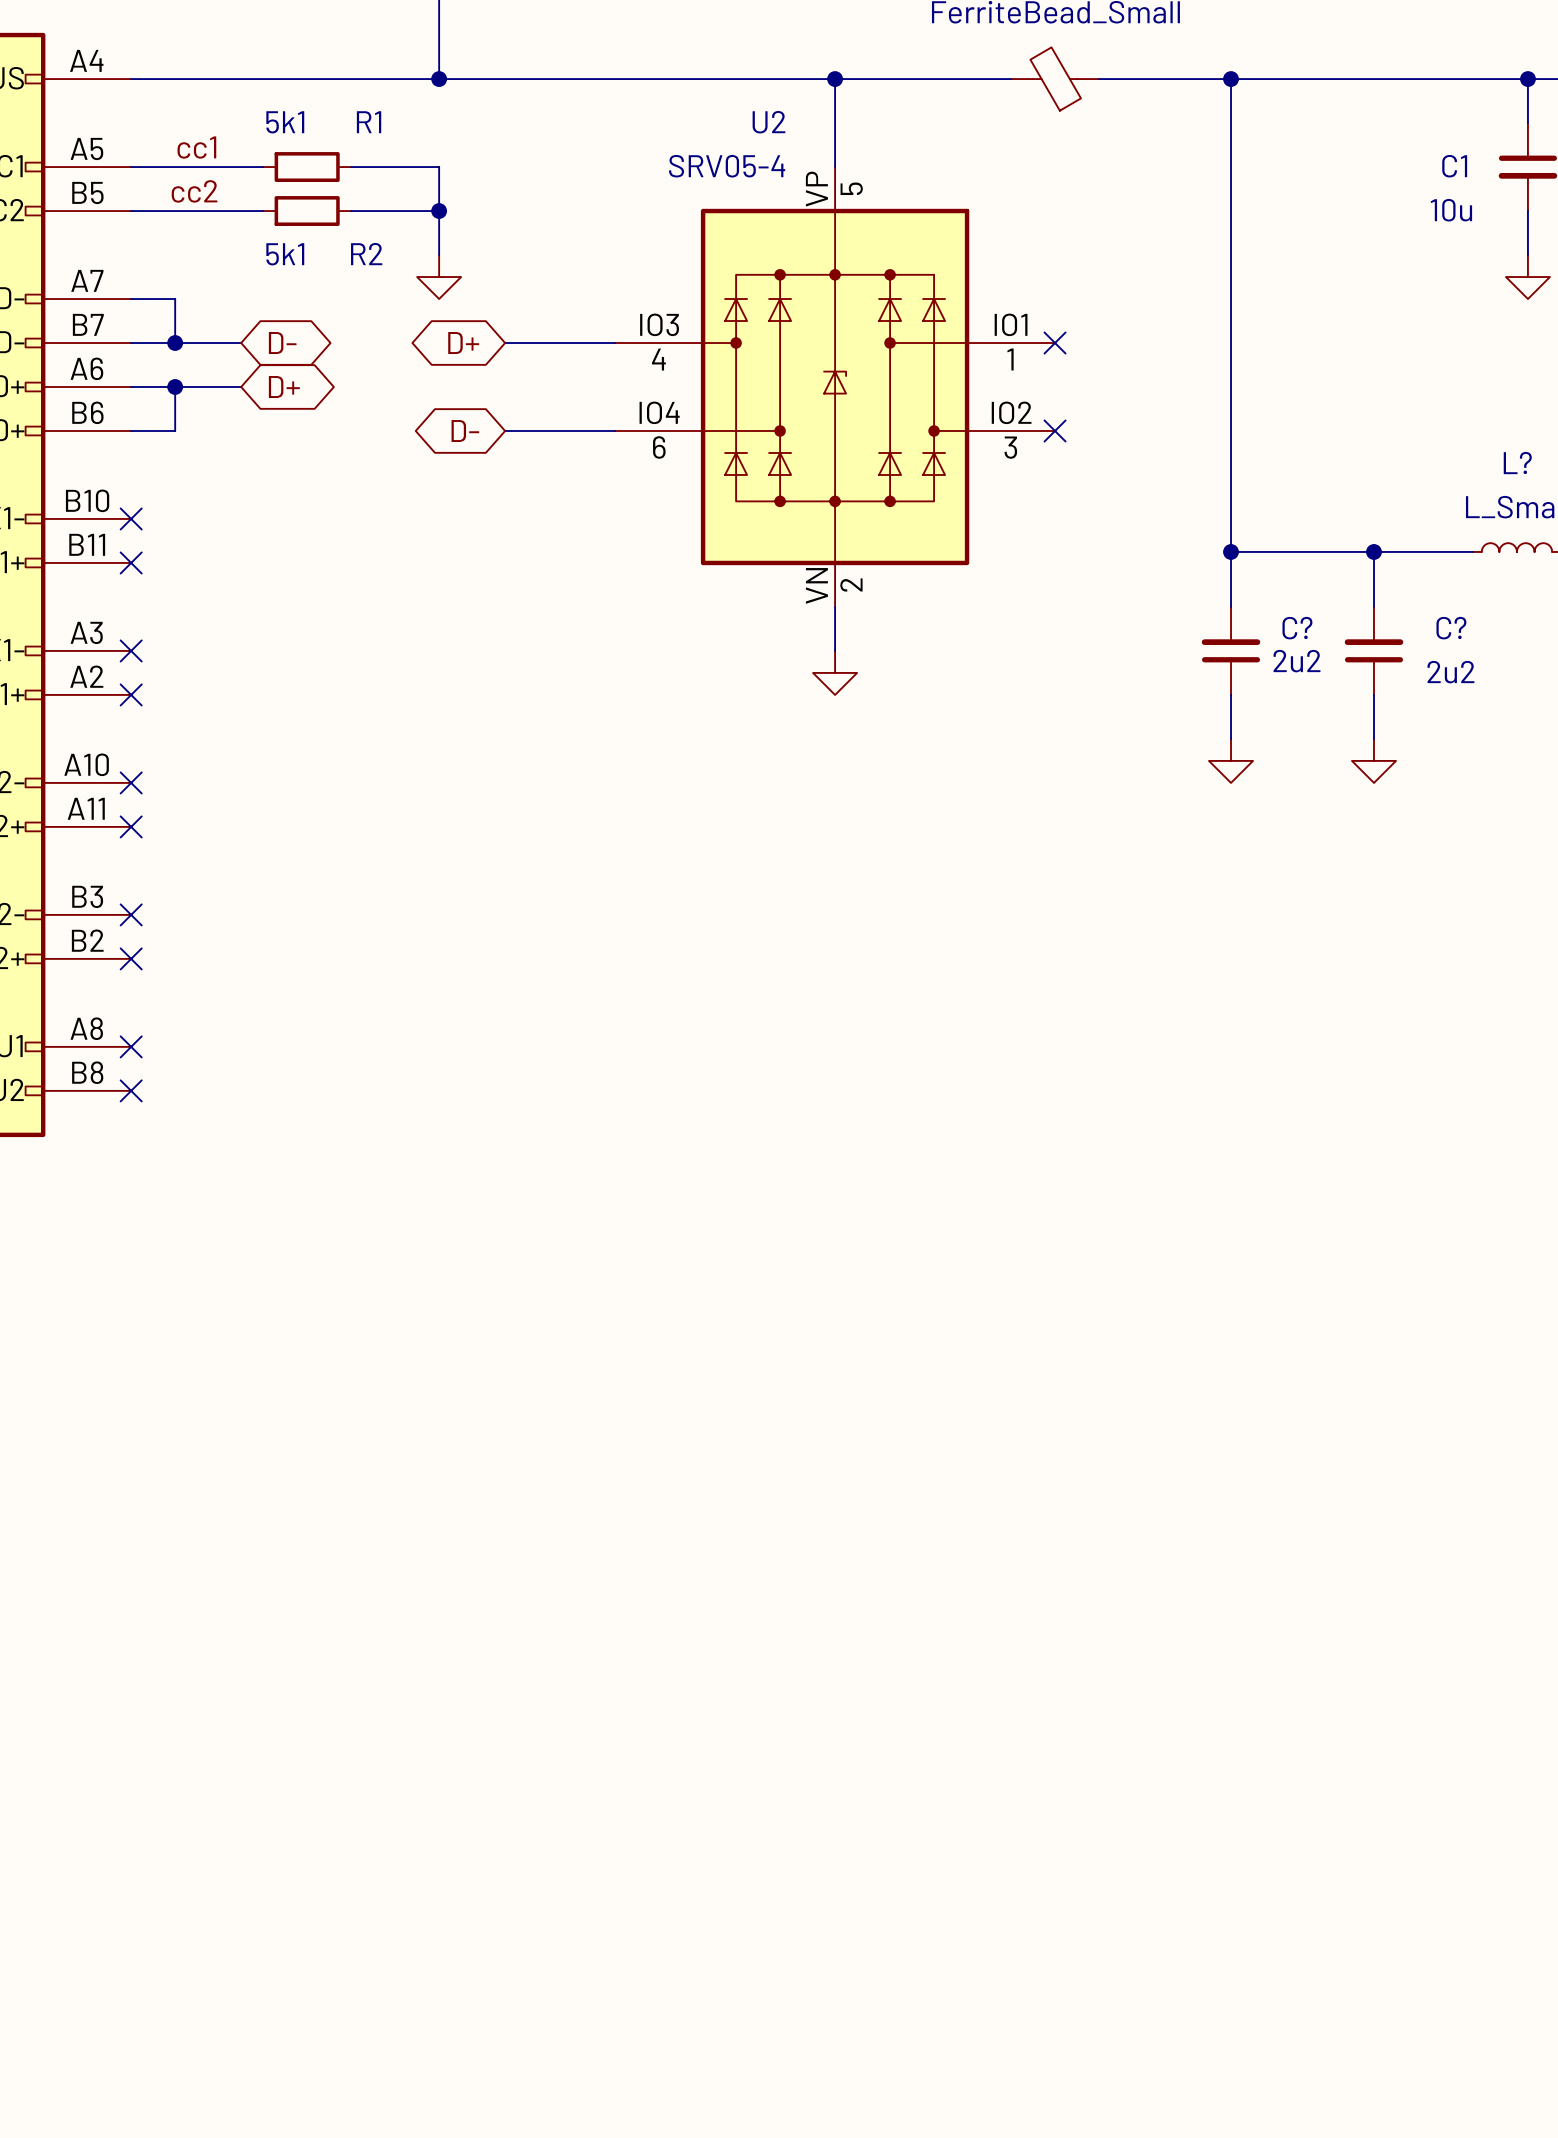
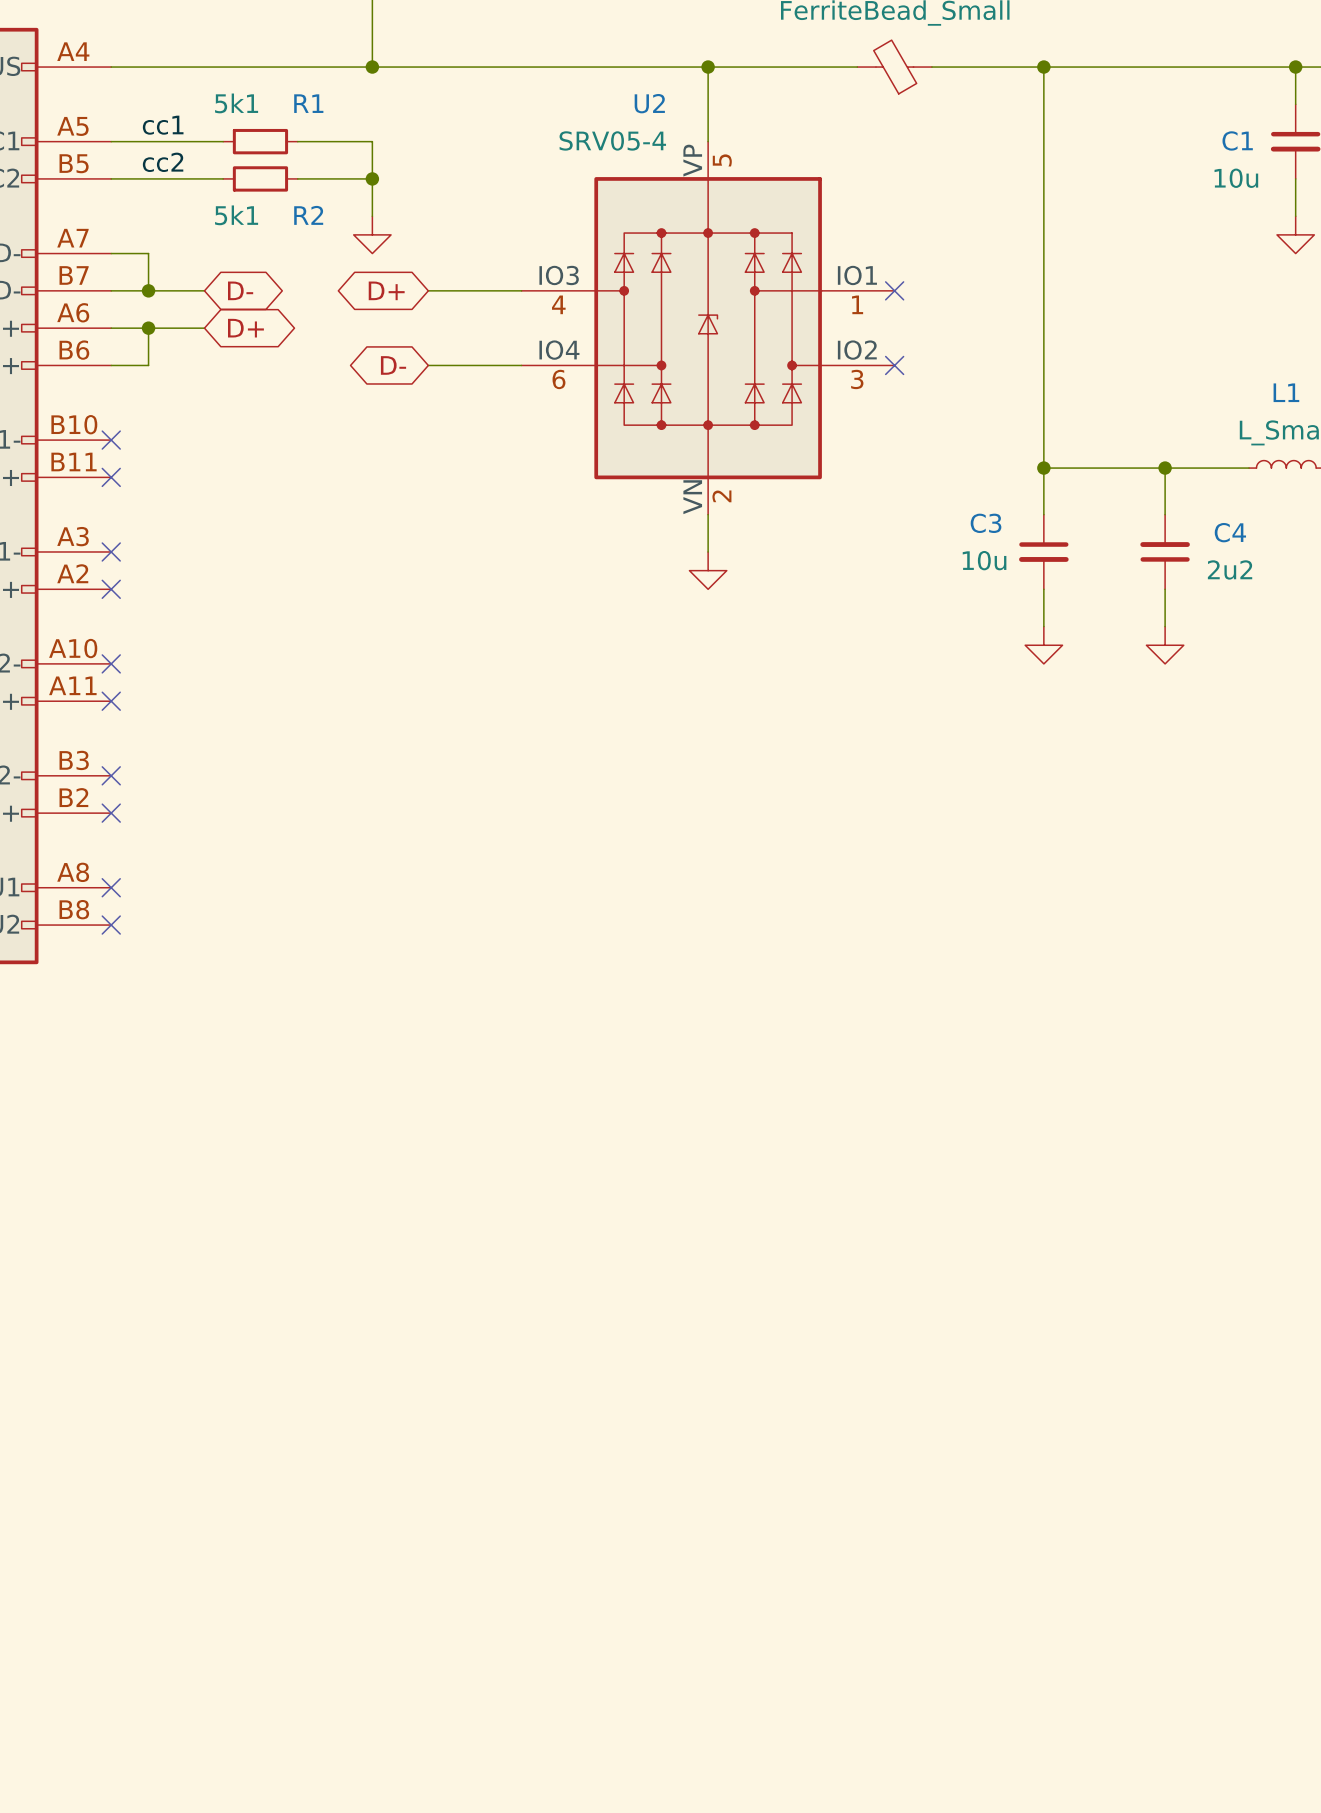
L? name: L? (1517, 463) -> L1 (1286, 392)
C? name: C? (1451, 628) -> C4 (1230, 532)
C?: 2u2 (1231, 650) -> none
C3: none -> 10u (1043, 551)

